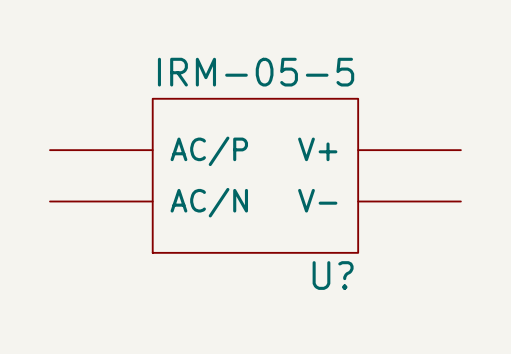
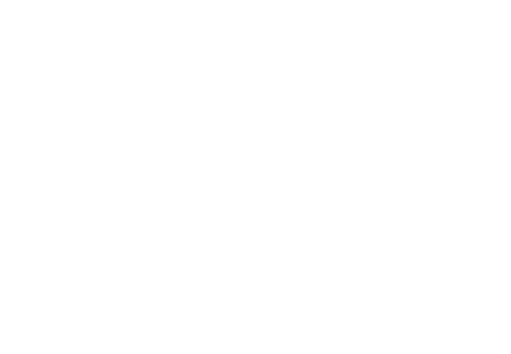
U?: IRM-05-5 (255, 175) -> none

